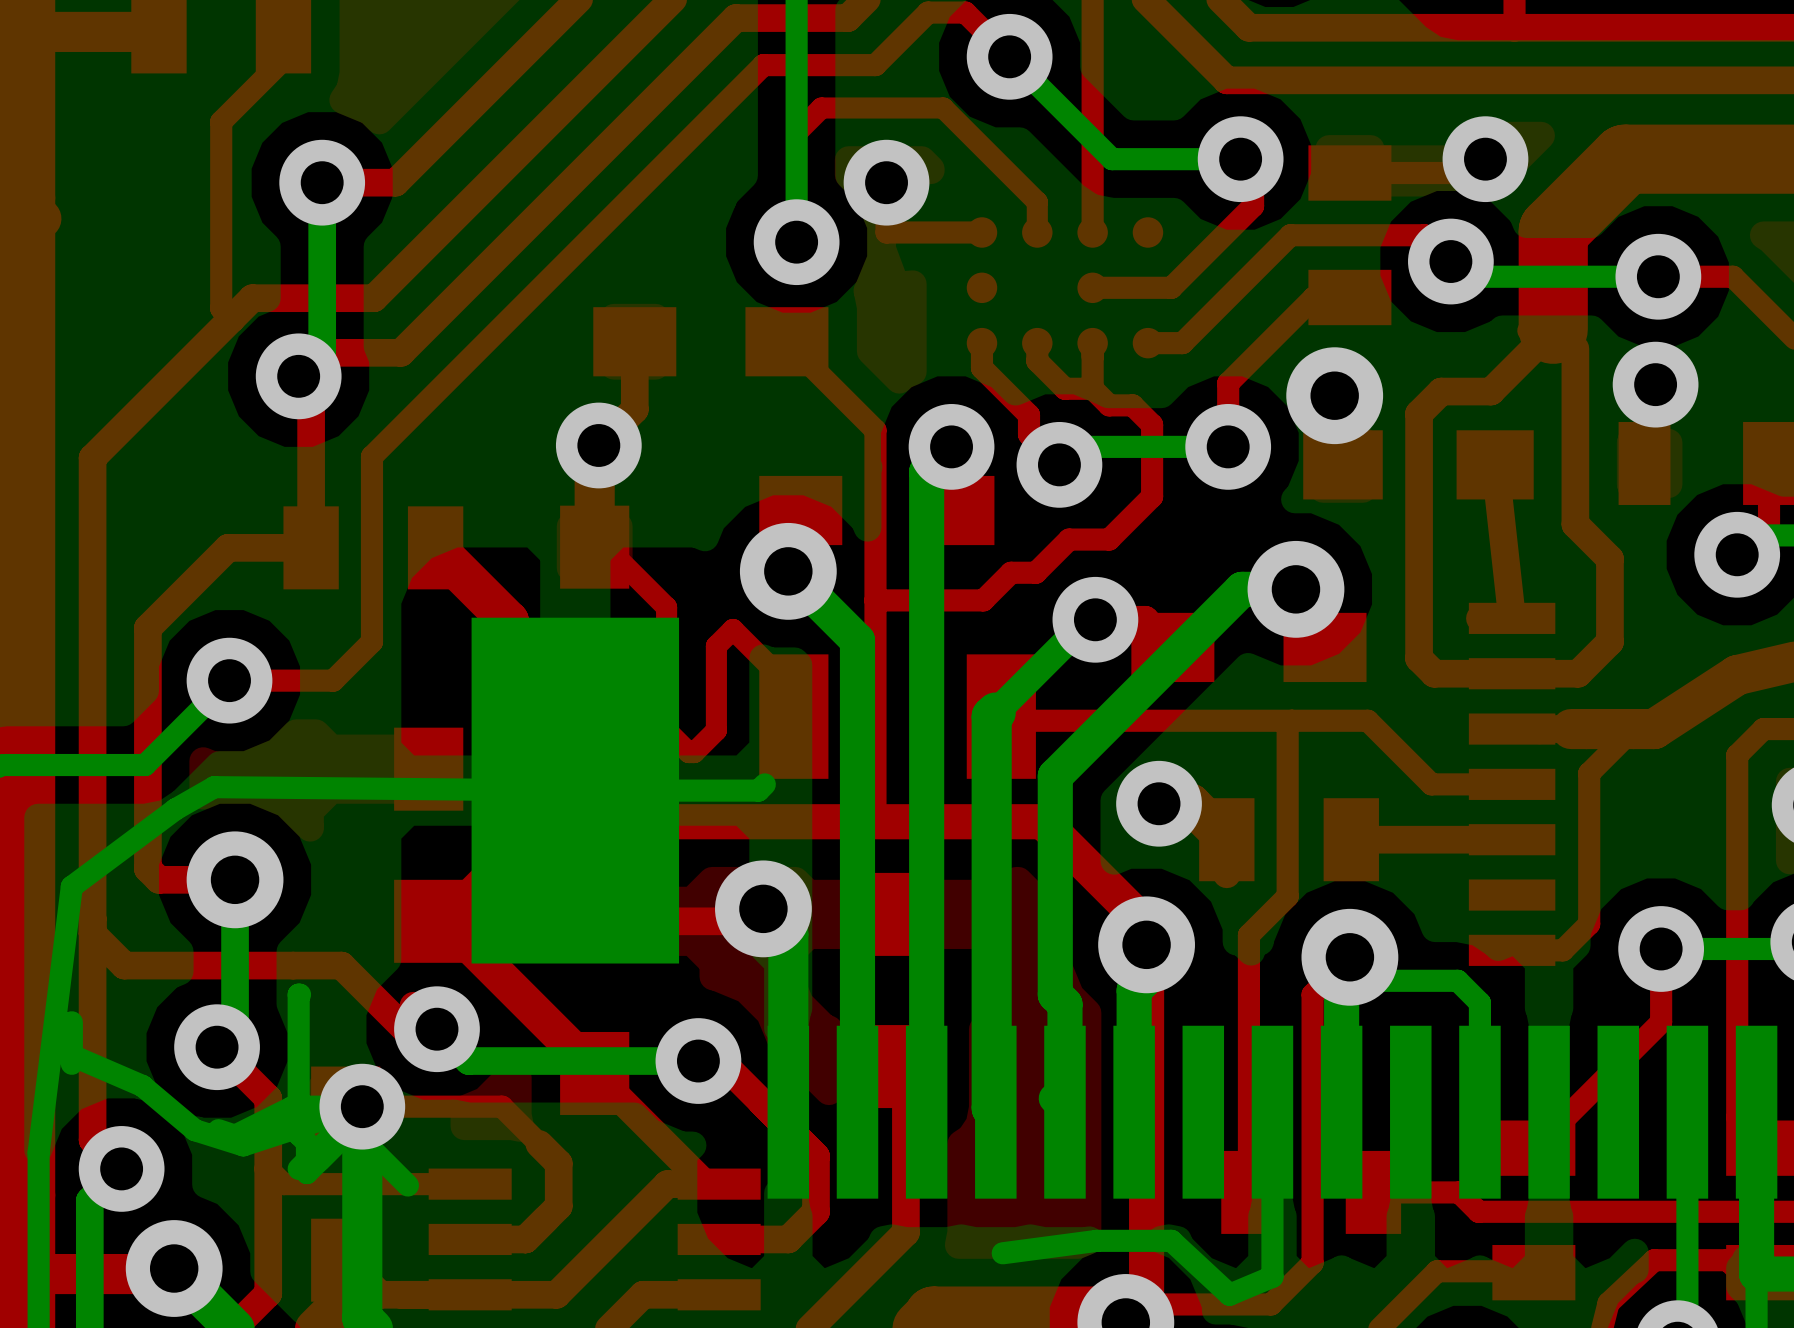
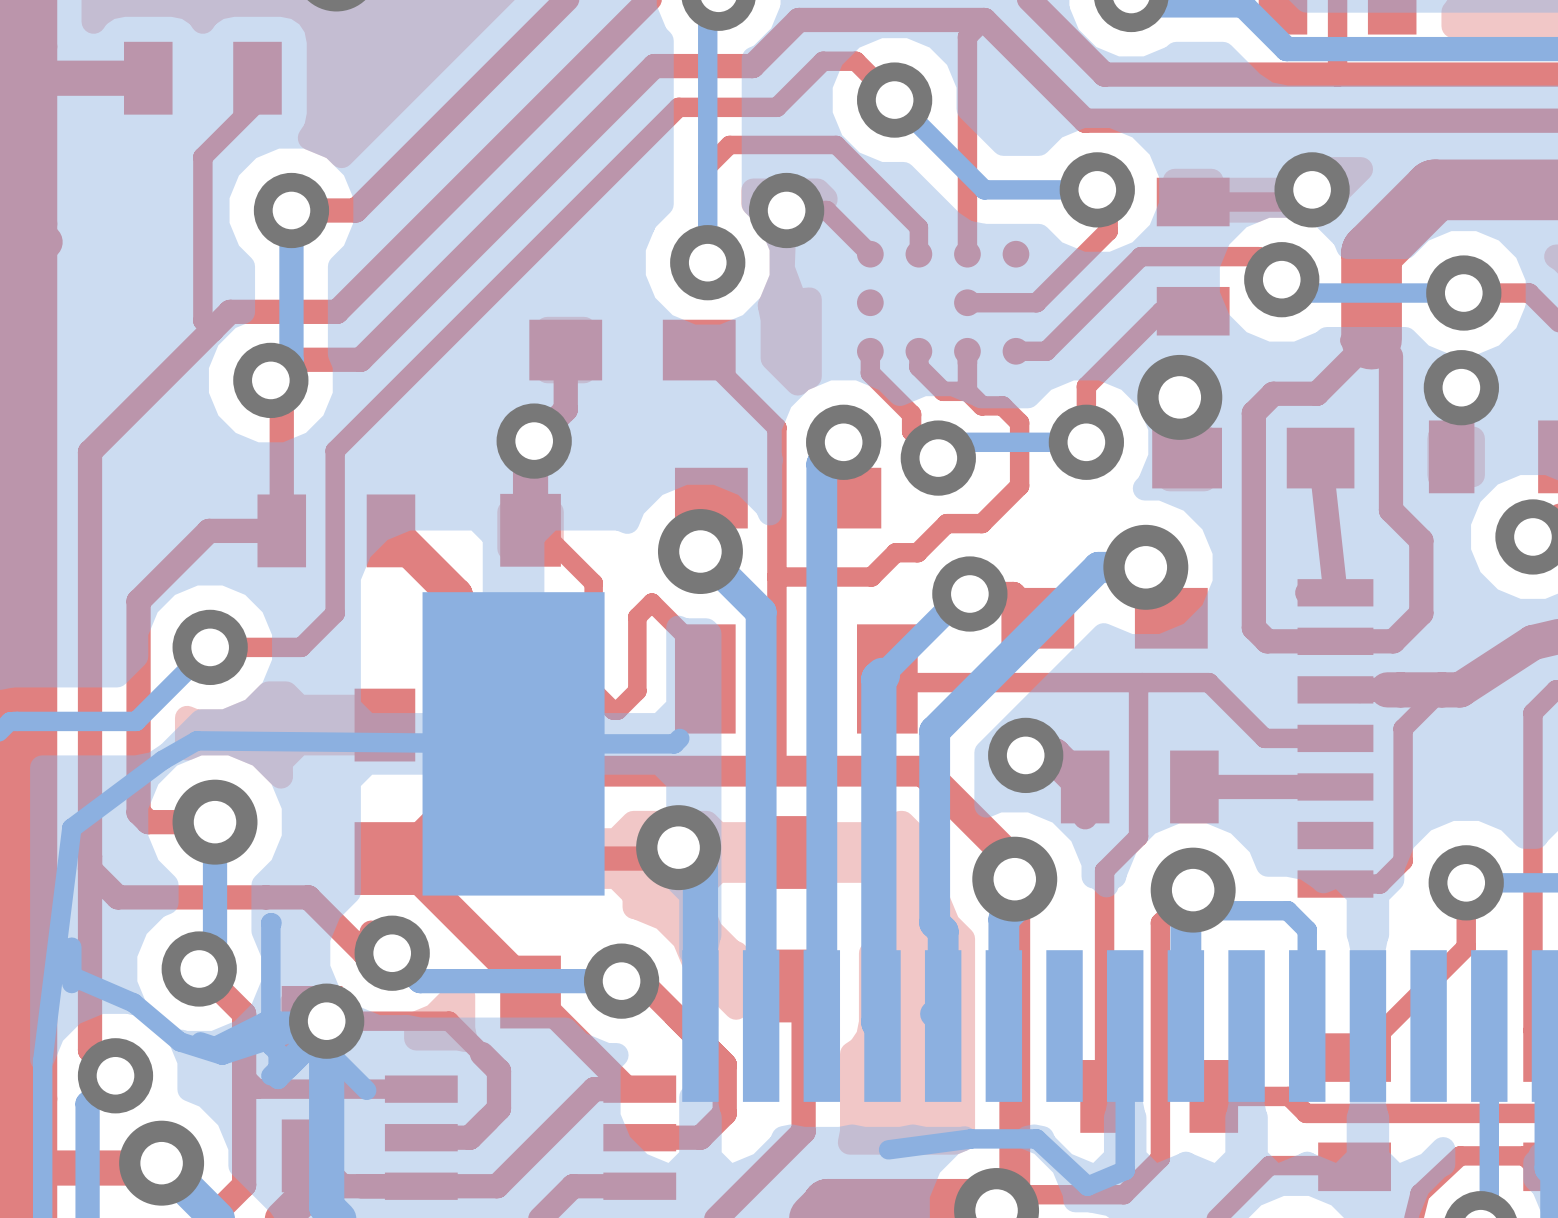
top track: (886, 182) (886, 232) (981, 232) -> (786, 210) (826, 210) (870, 254)

